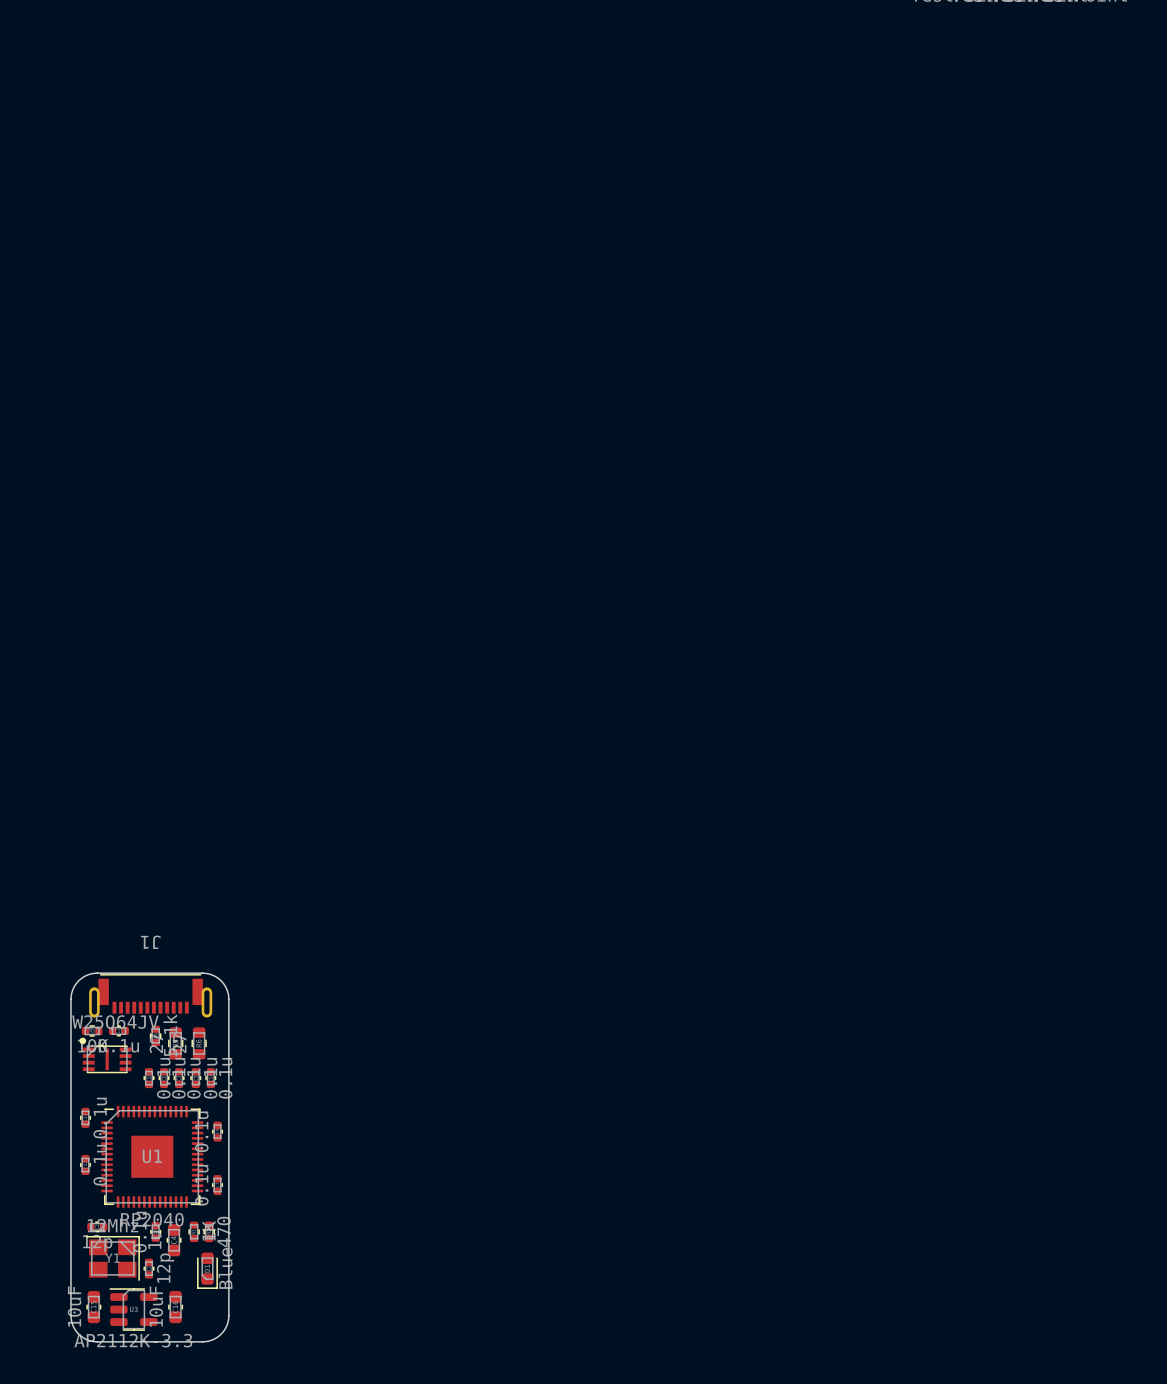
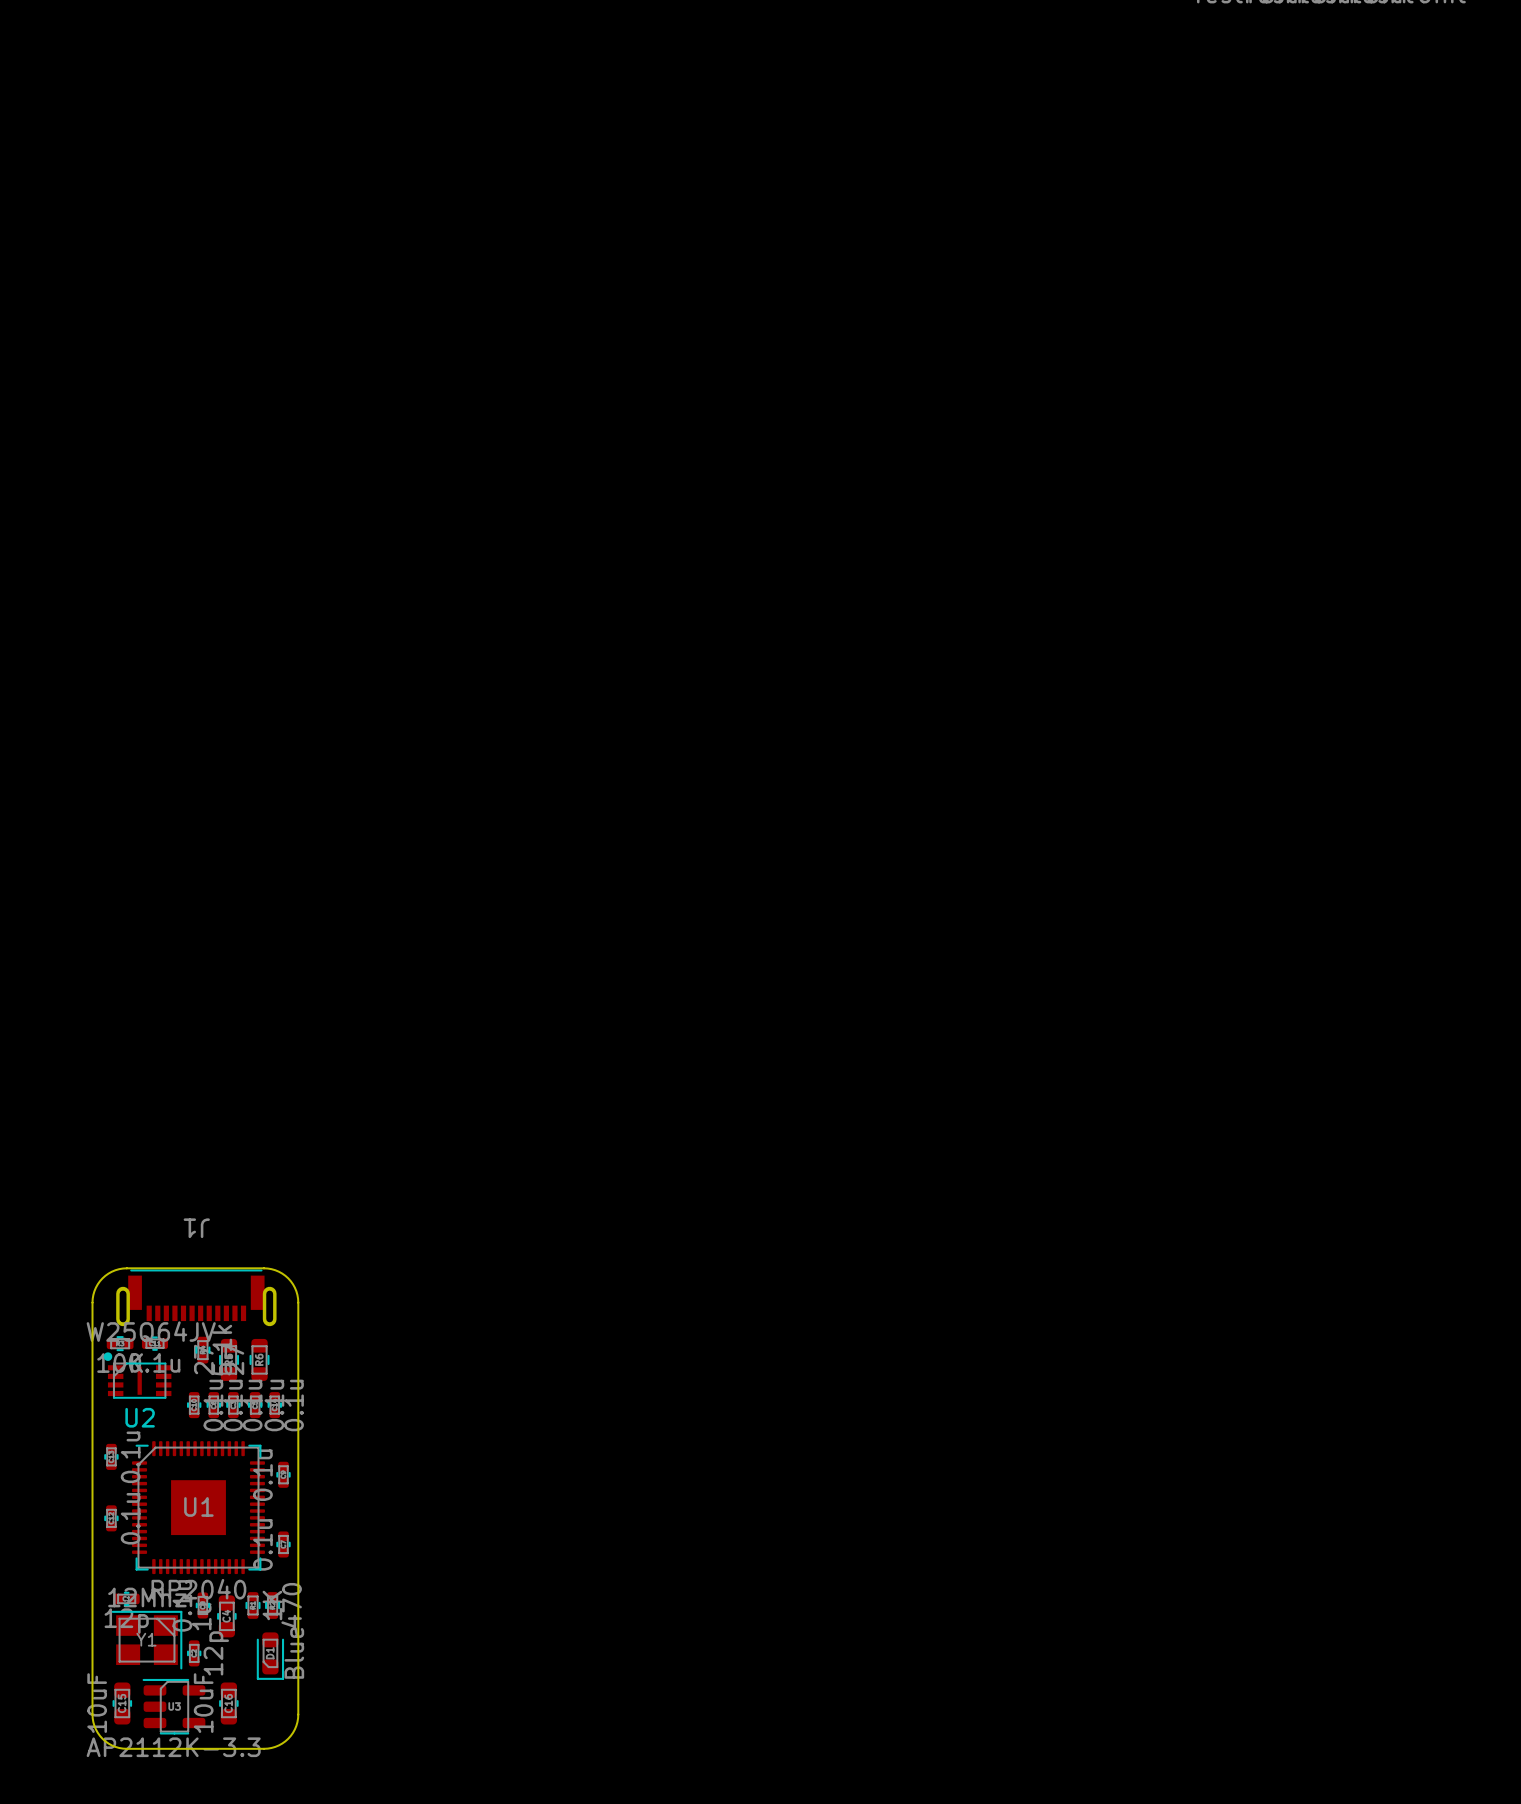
U2 name: none -> U2 (140, 1417)

